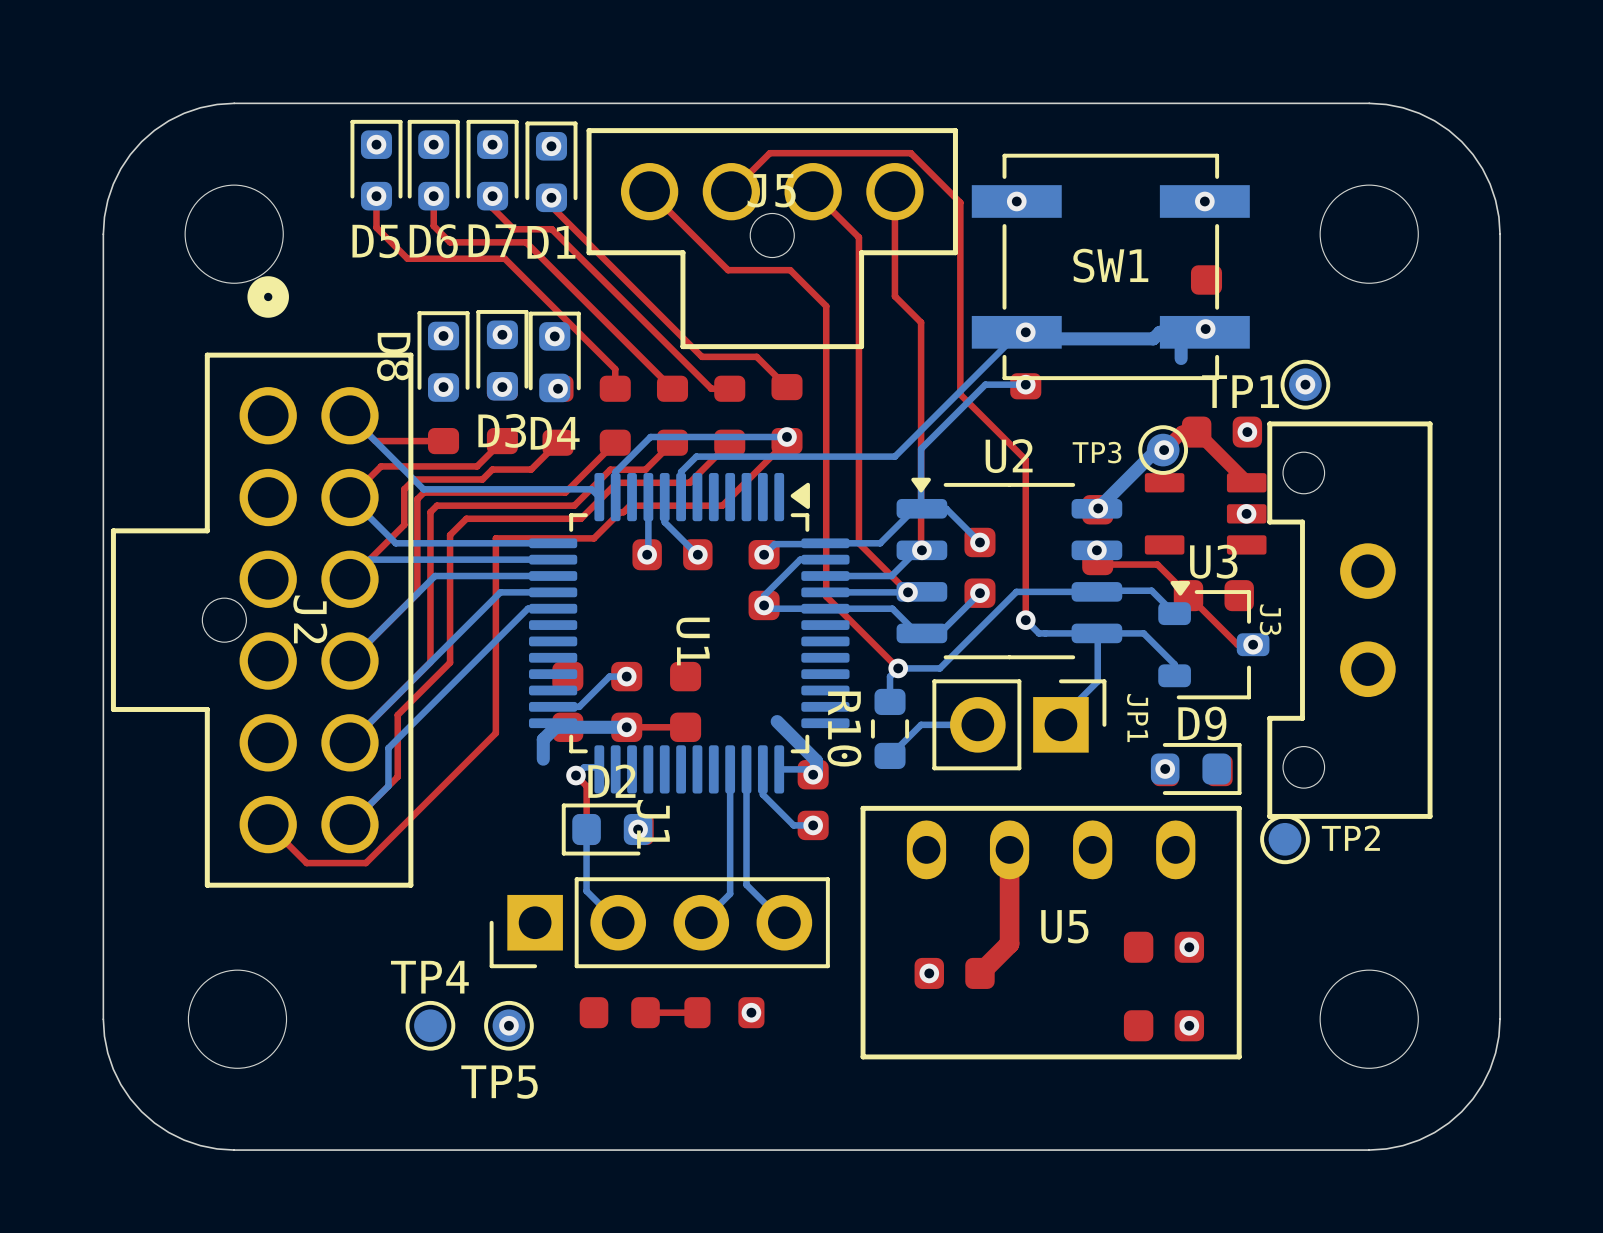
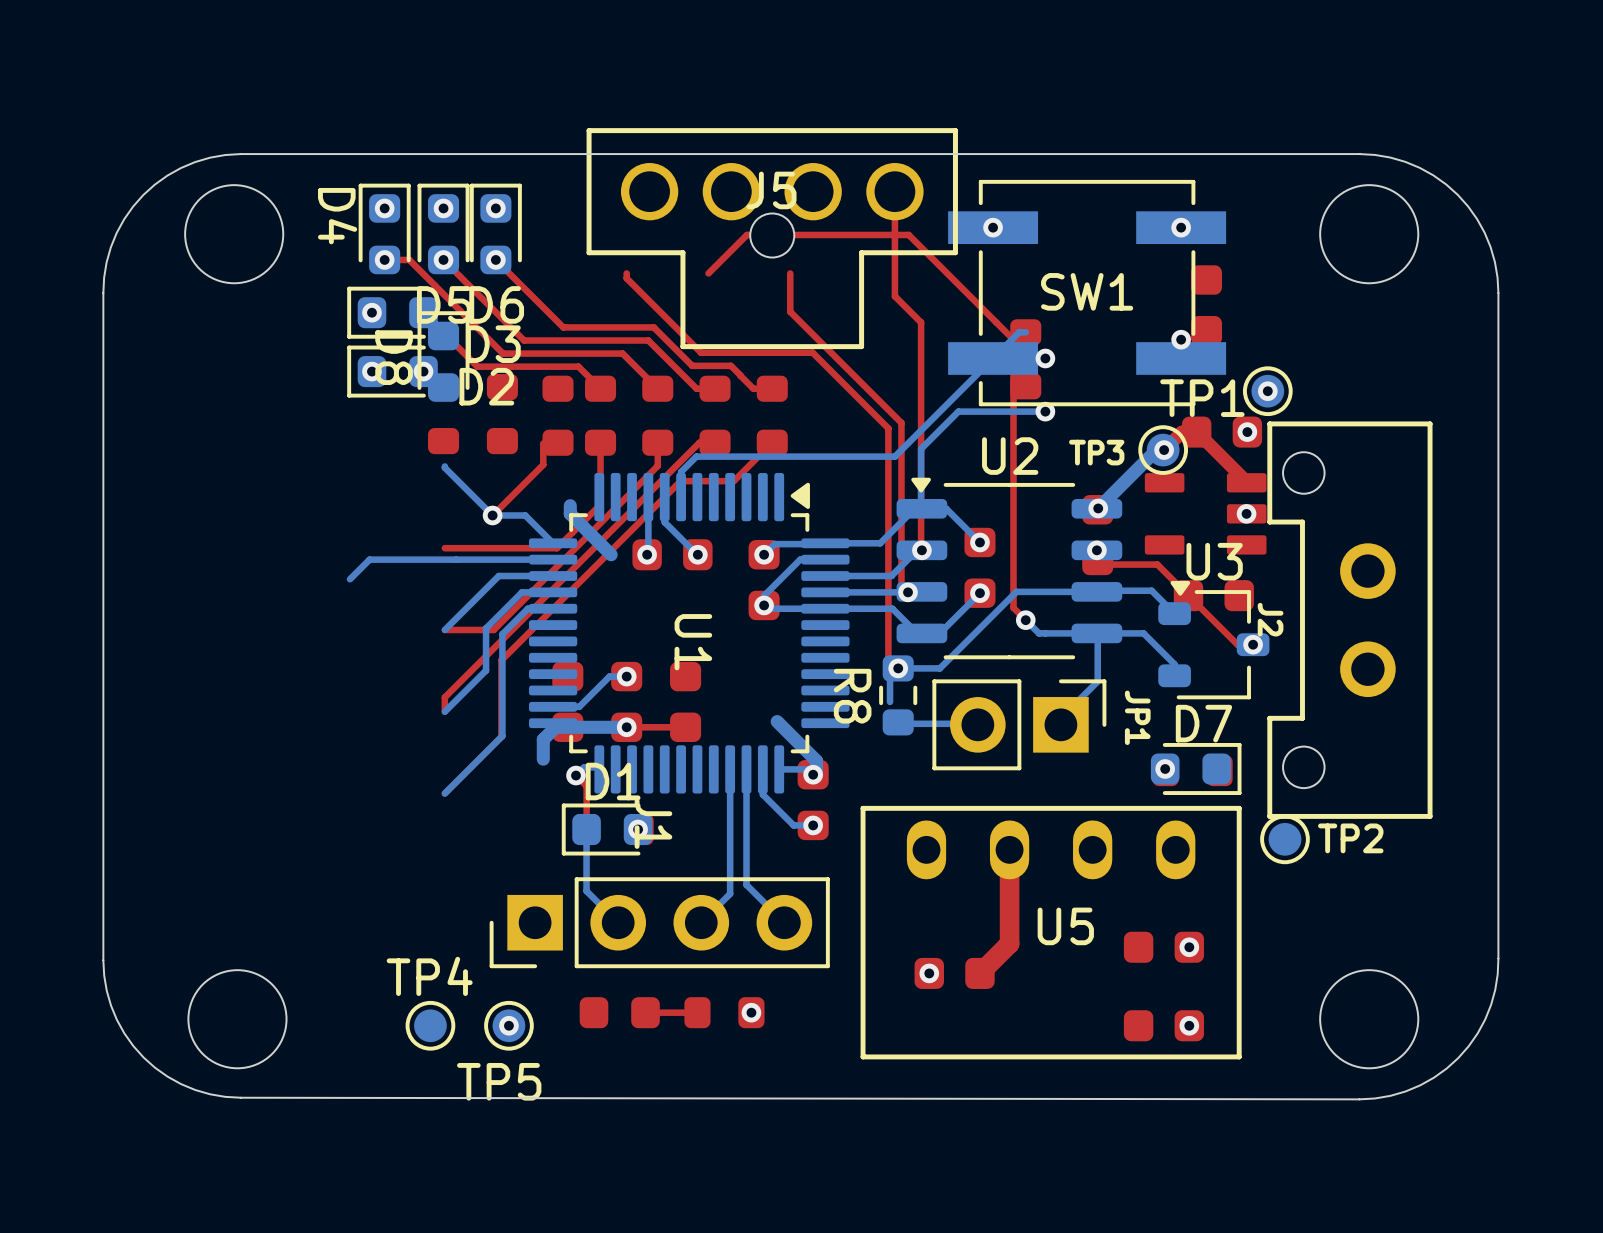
via: (376, 144) -> none
via: (433, 144) -> none
via: (492, 144) -> none
via: (551, 146) -> none
D5 position: (376, 165) -> (443, 228)
D6 position: (433, 165) -> (495, 228)
D7: (492, 165) -> none
D1: (551, 166) -> none
top track: (649, 191) (728, 270) (790, 270) (826, 306) (826, 596) (888, 658) -> (626, 273) (626, 278) (701, 352) (812, 352) (888, 428) (888, 658)
top track: (731, 191) (769, 153) (910, 153) (960, 202) (960, 394) (1025, 459) (1025, 620) -> (708, 273) (746, 234) (908, 234) (1013, 339) (1013, 607) (1025, 620)
top track: (813, 191) (858, 237) (858, 543) (901, 585) -> (790, 273) (790, 311) (901, 422) (901, 585)
top track: (376, 196) (376, 227) (407, 258) (504, 258) (615, 369) (615, 388) -> none
via position: (376, 196) -> (384, 208)
top track: (433, 196) (433, 226) (450, 242) (526, 242) (672, 388) -> none
via position: (433, 196) -> (443, 208)
top track: (492, 196) (492, 208) (513, 229) (551, 229) (711, 388) -> (443, 259) (524, 340) (648, 340) (696, 388) (711, 388)
via position: (492, 196) -> (495, 208)
top track: (551, 197) (551, 206) (701, 356) (756, 356) (786, 387) -> none
via: (551, 197) -> none
via position: (1016, 201) -> (993, 227)
via position: (1204, 201) -> (1181, 227)
top track: none -> (384, 259) (409, 259) (503, 353) (622, 353) (657, 388)
via: none -> (384, 259)
via: none -> (443, 259)
top track: none -> (495, 259) (563, 327) (653, 327) (692, 365) (730, 365) (740, 375)
via: none -> (495, 259)
SW1 position: (1110, 266) -> (1087, 293)
board edge: (103, 293) (104, 217) (113, 184) (130, 154) (154, 130) (184, 113) (217, 104) (234, 103) (1386, 104) (1403, 107) (1434, 120) (1461, 141) (1473, 154) (1482, 168) (1495, 200) (1500, 234) (1498, 1036) (1495, 1053) (1482, 1084) (1461, 1111) (1434, 1132) (1403, 1145) (1369, 1150) (217, 1148) (184, 1140) (168, 1132) (141, 1111) (120, 1084) (107, 1053) (104, 1036) (103, 960) -> (103, 293) (104, 277) (110, 247) (124, 219) (143, 195) (167, 175) (195, 162) (225, 155) (240, 154) (1374, 154) (1405, 161) (1433, 175) (1446, 184) (1468, 206) (1477, 219) (1490, 247) (1497, 277) (1498, 293) (1497, 974) (1491, 1004) (1477, 1033) (1468, 1046) (1446, 1068) (1420, 1085) (1390, 1095) (1359, 1099) (225, 1096) (195, 1090) (167, 1076) (155, 1067) (133, 1046) (116, 1019) (111, 1005) (104, 975) (103, 960)
via: none -> (371, 312)
top track: none -> (423, 312) (477, 366) (578, 366) (600, 388)
via position: (1205, 329) -> (1181, 339)
via: (1025, 332) -> none
bottom track: (1204, 332) (1159, 332) (1153, 338) (1036, 338) -> none
via: (502, 334) -> none
via: (443, 336) -> none
via: (554, 336) -> none
D3 rotation: 0° (502, 355) -> 90° counterclockwise (392, 312)
D3 position: (502, 355) -> (392, 312)
D4 position: (554, 356) -> (384, 228)
via: none -> (1045, 358)
via: none -> (371, 371)
D2: none -> (392, 371)
via: none -> (423, 371)
top track: none -> (740, 375) (753, 388) (772, 388)
bottom track: (1025, 384) (985, 384) (958, 411) -> (1045, 411) (958, 411)
via: (1025, 384) -> none
TP1 position: (1305, 384) -> (1267, 391)
via position: (1305, 384) -> (1267, 391)
via: (443, 387) -> none
via: (502, 387) -> none
via: (558, 388) -> none
via: none -> (1045, 411)
part position: (786, 414) -> (772, 415)
top track: (349, 415) (375, 441) (443, 441) -> none
bottom track: (349, 415) (423, 489) (591, 489) (599, 497) -> none
part position: (615, 415) -> (600, 415)
part position: (672, 415) -> (657, 415)
part position: (729, 415) -> (715, 415)
D4 name rotation: 0° (555, 433) -> 90° clockwise (337, 216)
D4 name position: D4 (555, 433) -> D4 (337, 216)
bottom track: (786, 436) (650, 436) (615, 471) (615, 497) -> none
via: (786, 436) -> none
top track: (502, 441) (477, 466) (381, 466) (349, 497) -> none
top track: (786, 441) (722, 505) (629, 505) (623, 512) (620, 512) (594, 538) (495, 538) (495, 733) (365, 863) (306, 863) (268, 824) -> none
top track: (558, 442) (531, 469) (492, 469) (482, 479) (414, 479) (404, 489) (404, 524) (349, 579) -> none
top track: none -> (600, 442) (600, 504) (556, 548) (444, 548)
top track: (615, 442) (565, 492) (423, 492) (417, 499) (417, 593) (349, 661) -> none
top track: none -> (657, 442) (657, 465) (493, 629) (444, 629)
top track: (672, 442) (645, 469) (610, 469) (574, 505) (436, 505) (430, 512) (430, 662) (349, 742) -> none
top track: none -> (715, 442) (699, 442) (444, 697) (444, 711)
top track: (729, 442) (689, 482) (616, 482) (580, 518) (466, 518) (450, 535) (450, 662) (397, 715) (397, 776) (349, 824) -> none
top track: none -> (772, 442) (733, 481) (680, 481) (501, 660) (501, 736) (444, 793)
top track: none -> (543, 443) (543, 464) (492, 515)
bottom track: (349, 497) (395, 543) (553, 543) -> (444, 466) (492, 515) (525, 515) (553, 543)
bottom track: none -> (570, 505) (570, 513) (611, 554)
via: none -> (492, 515)
bottom track: (498, 576) (435, 576) (349, 661) -> (498, 576) (444, 629)
J2: (262, 581) -> none
bottom track: (522, 592) (500, 592) (349, 742) -> (522, 592) (486, 628) (486, 670) (444, 711)
J3 name: J3 (1270, 619) -> J2 (1270, 619)
bottom track: (502, 634) (388, 748) (388, 786) (349, 824) -> (502, 634) (502, 735) (444, 793)
R8: none -> (898, 695)
bottom track: none -> (972, 723) (898, 723)
D9 name: D9 (1202, 723) -> D7 (1203, 723)
bottom track: (977, 724) (921, 724) (890, 755) -> none
R10: (890, 728) -> none
D2 name: D2 (611, 781) -> D1 (613, 781)

